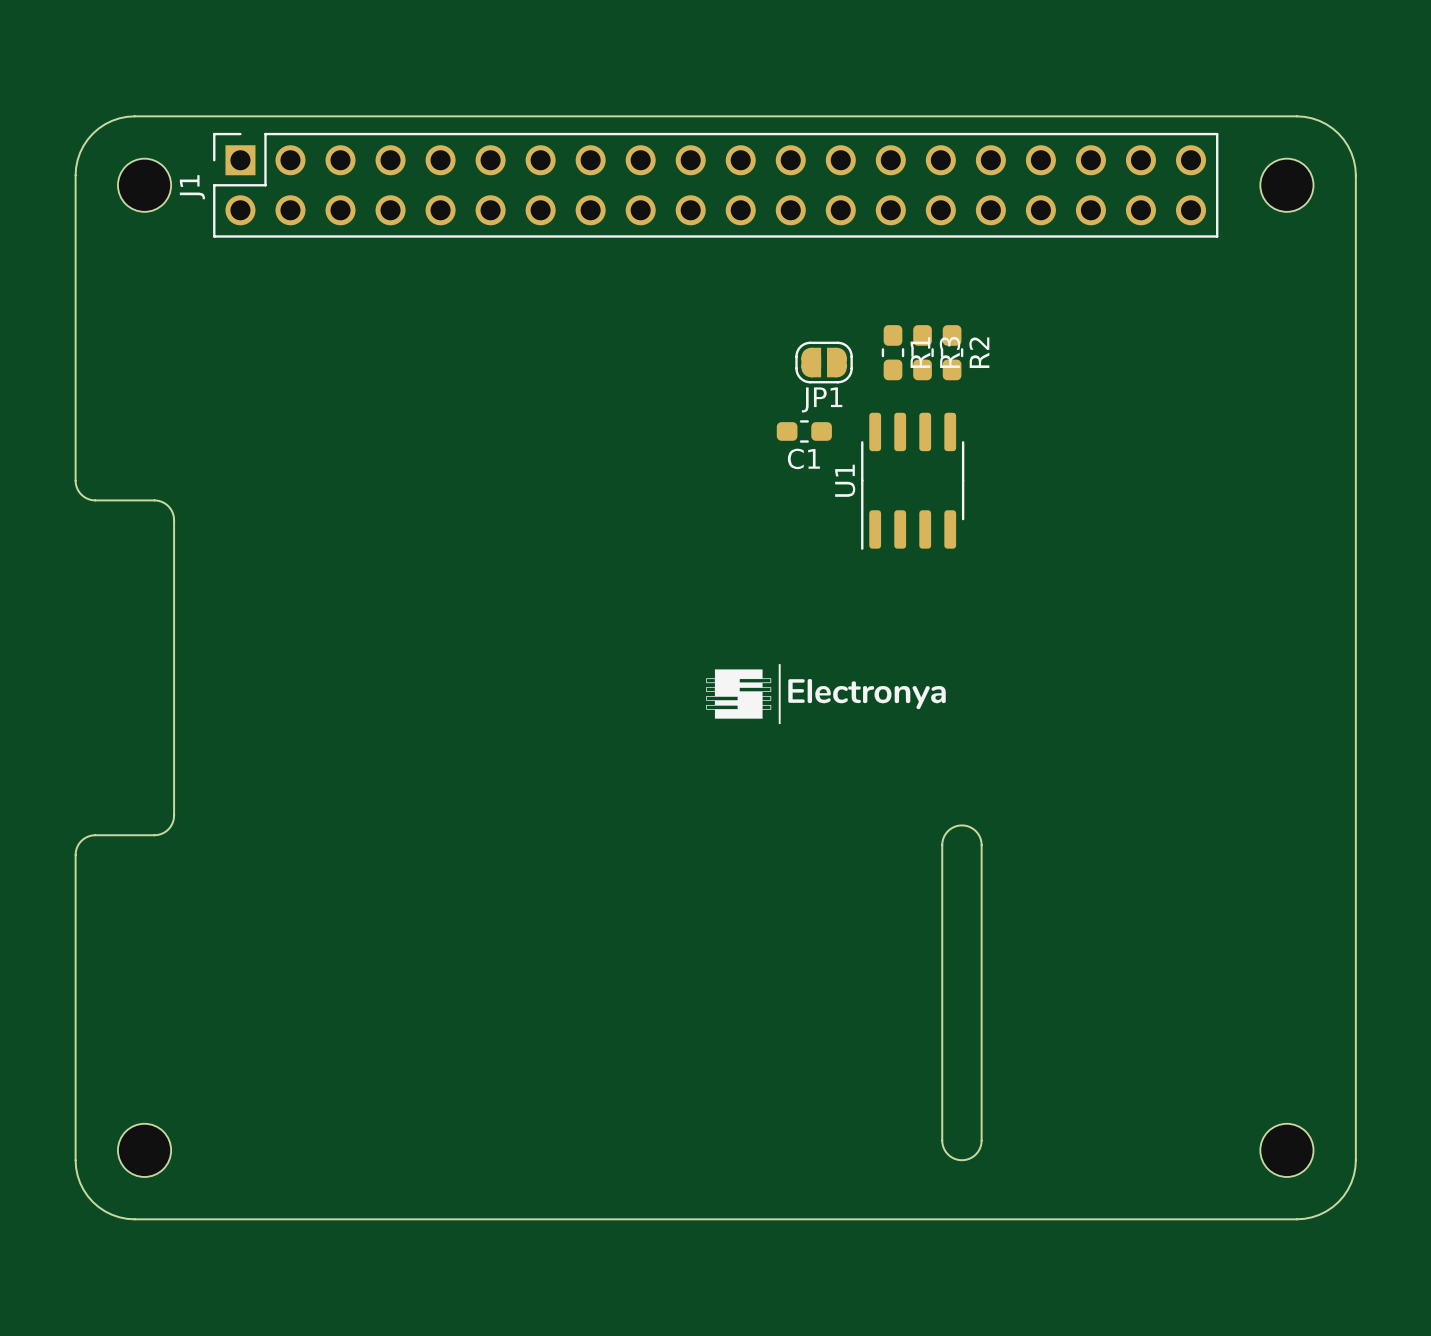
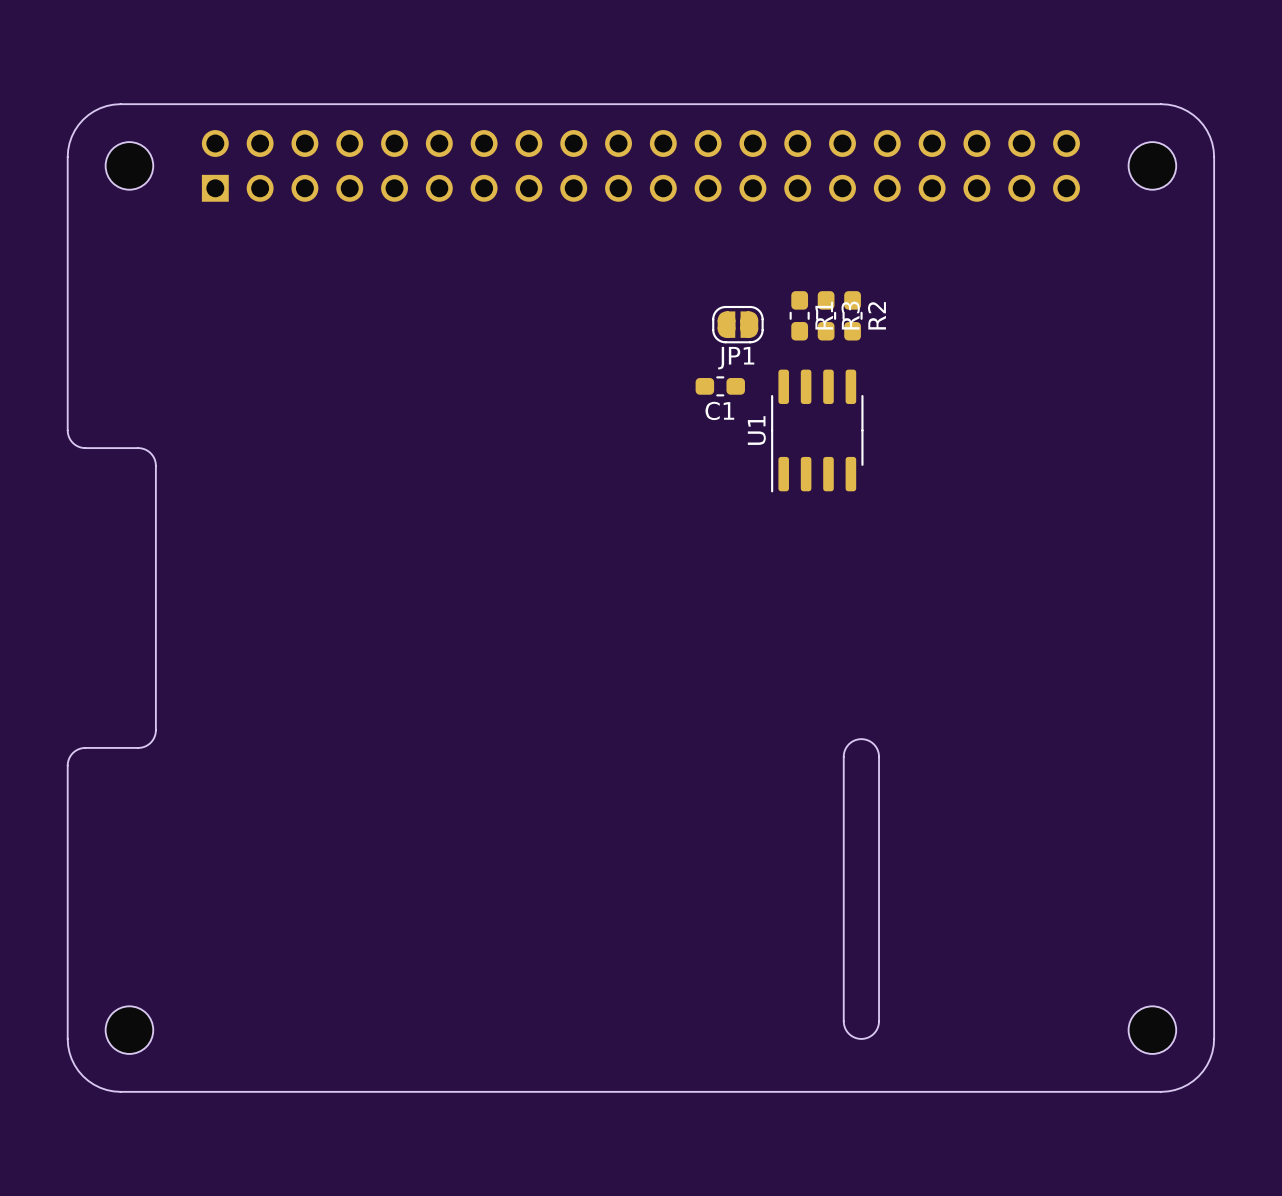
J1: (715, 185) -> none
part: none -> (640, 165)
drawing: [706, 664, 946, 724] -> none

